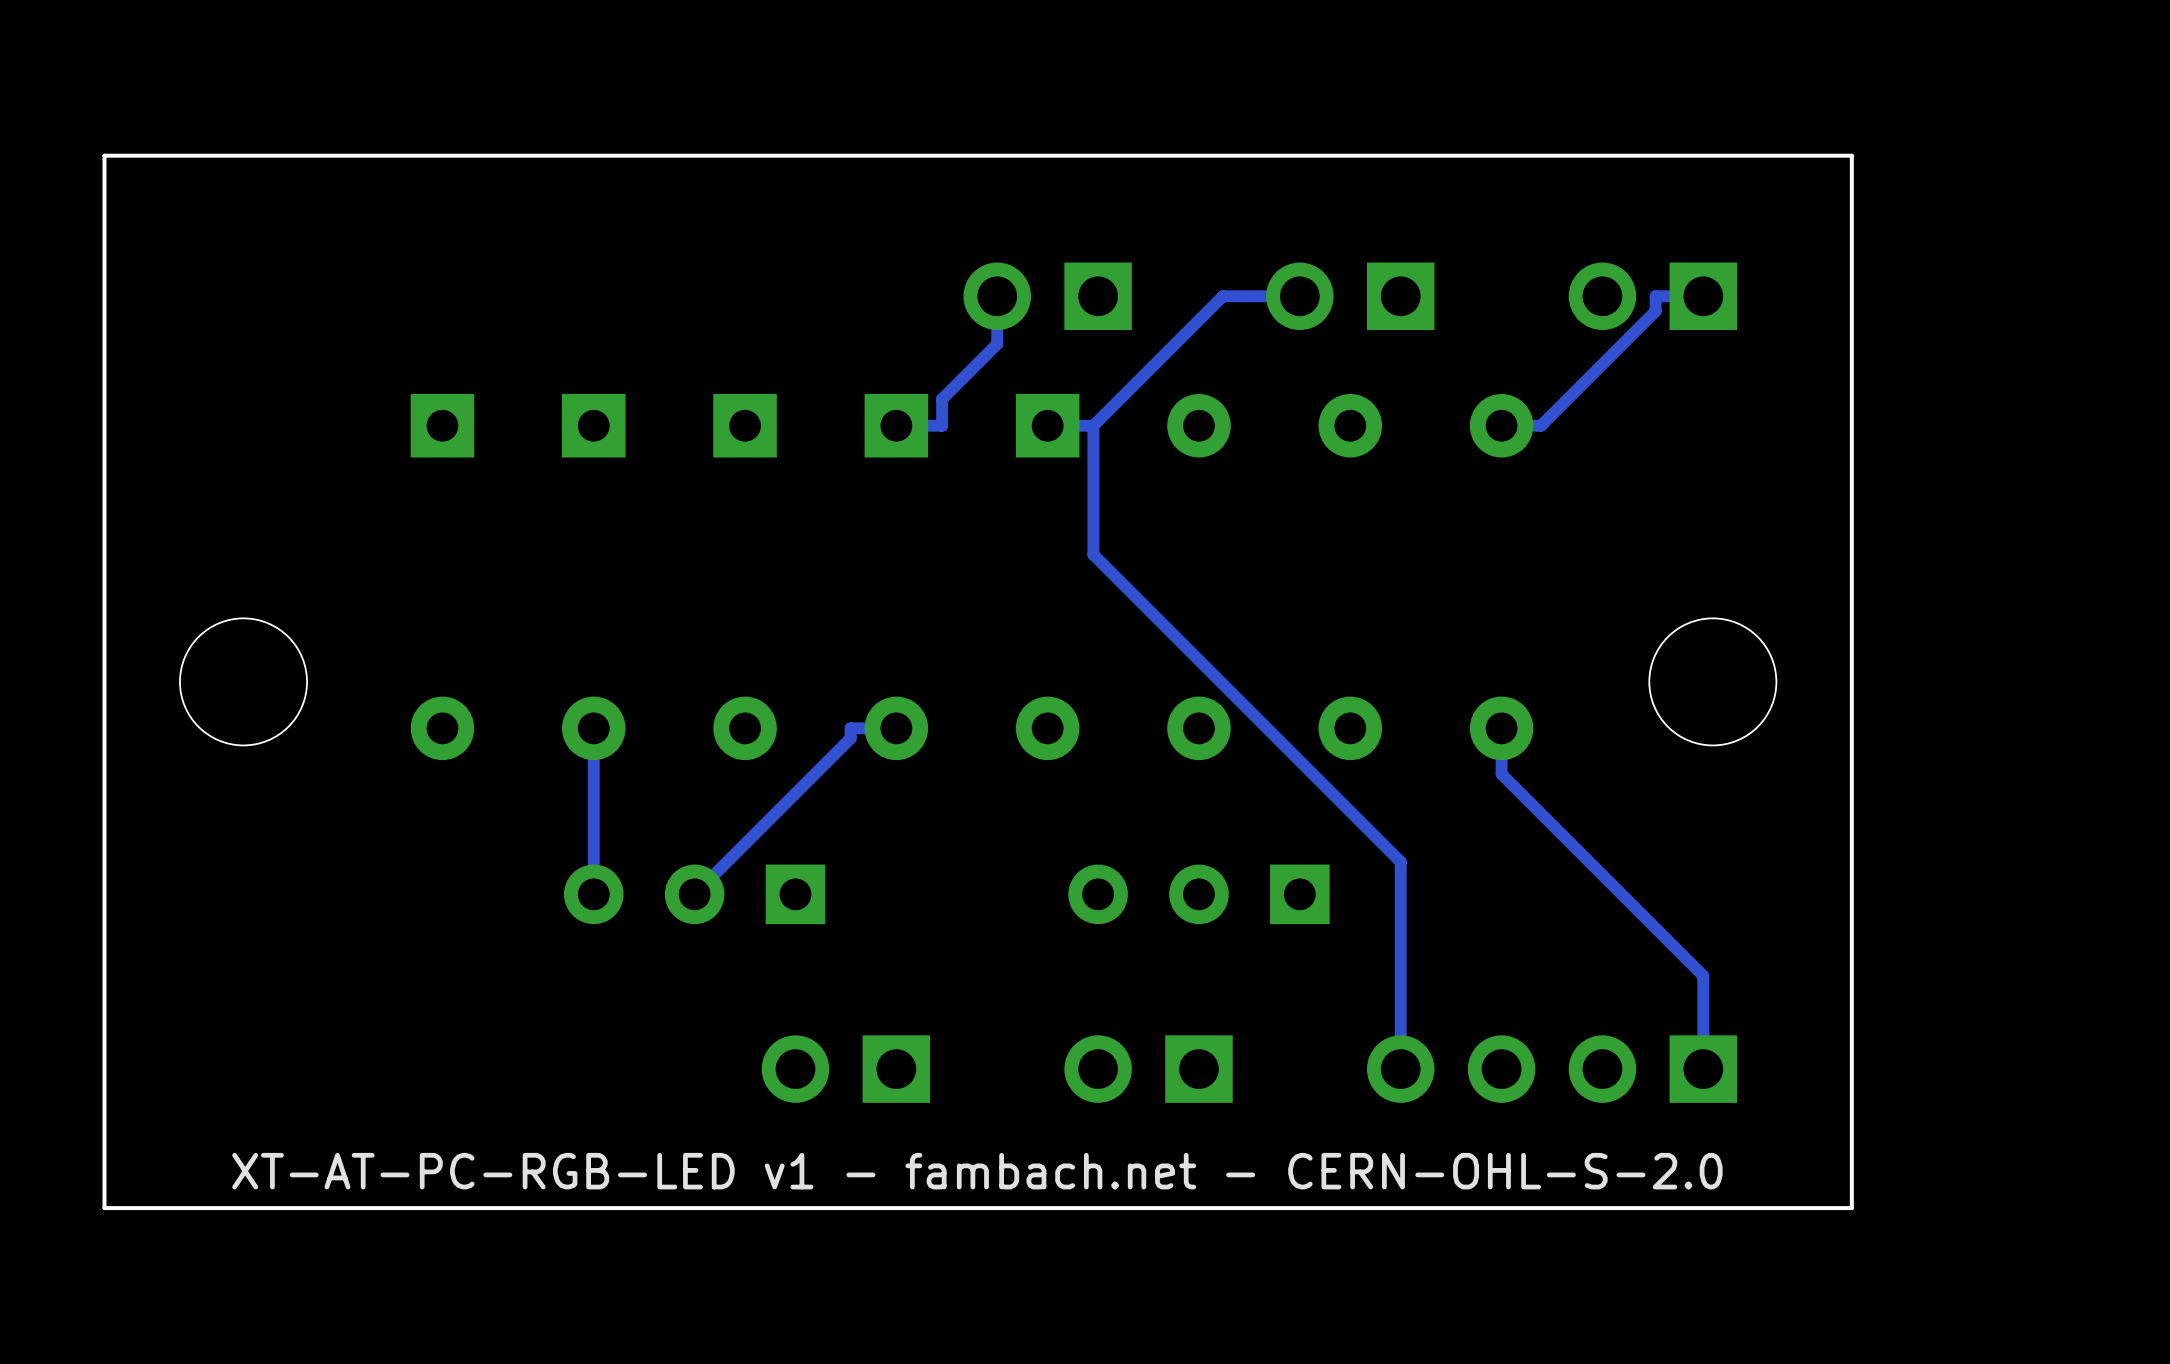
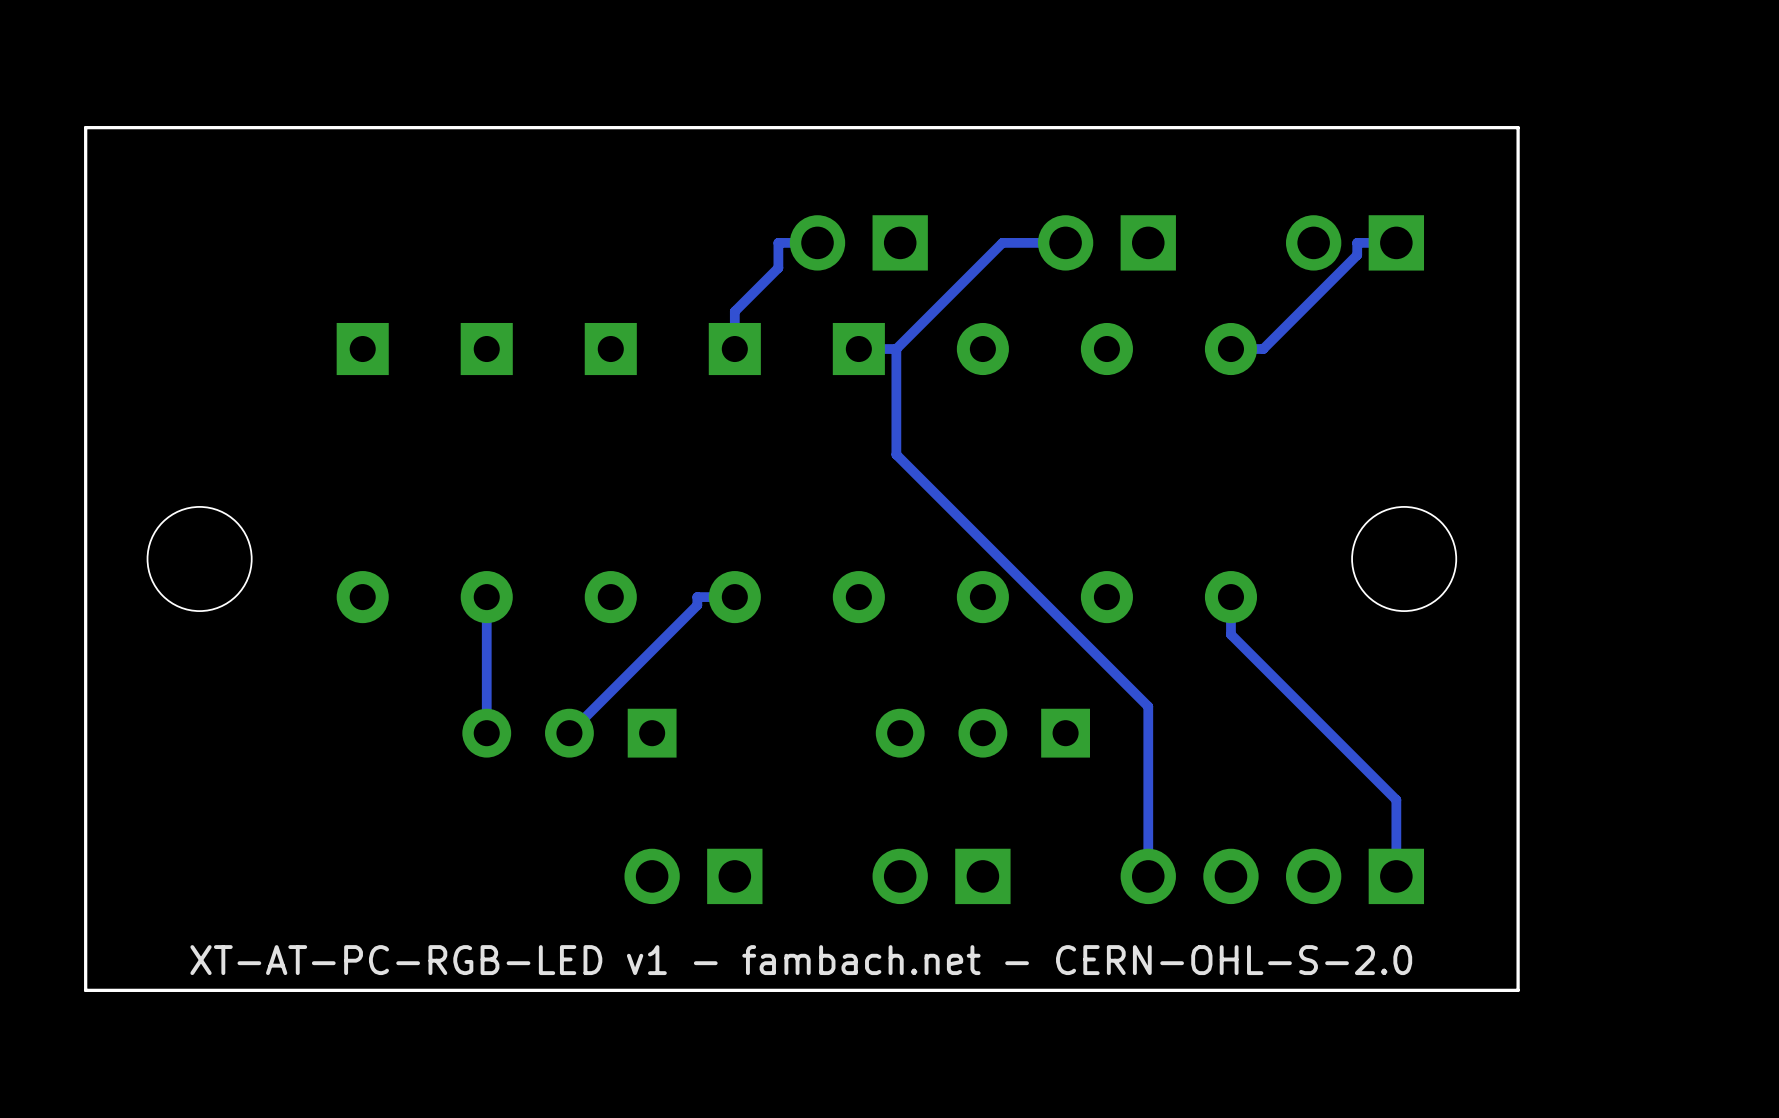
track: (997, 296) (997, 344) (942, 399) (942, 425) (896, 425) -> (817, 242) (778, 242) (778, 267) (734, 311) (734, 349)

